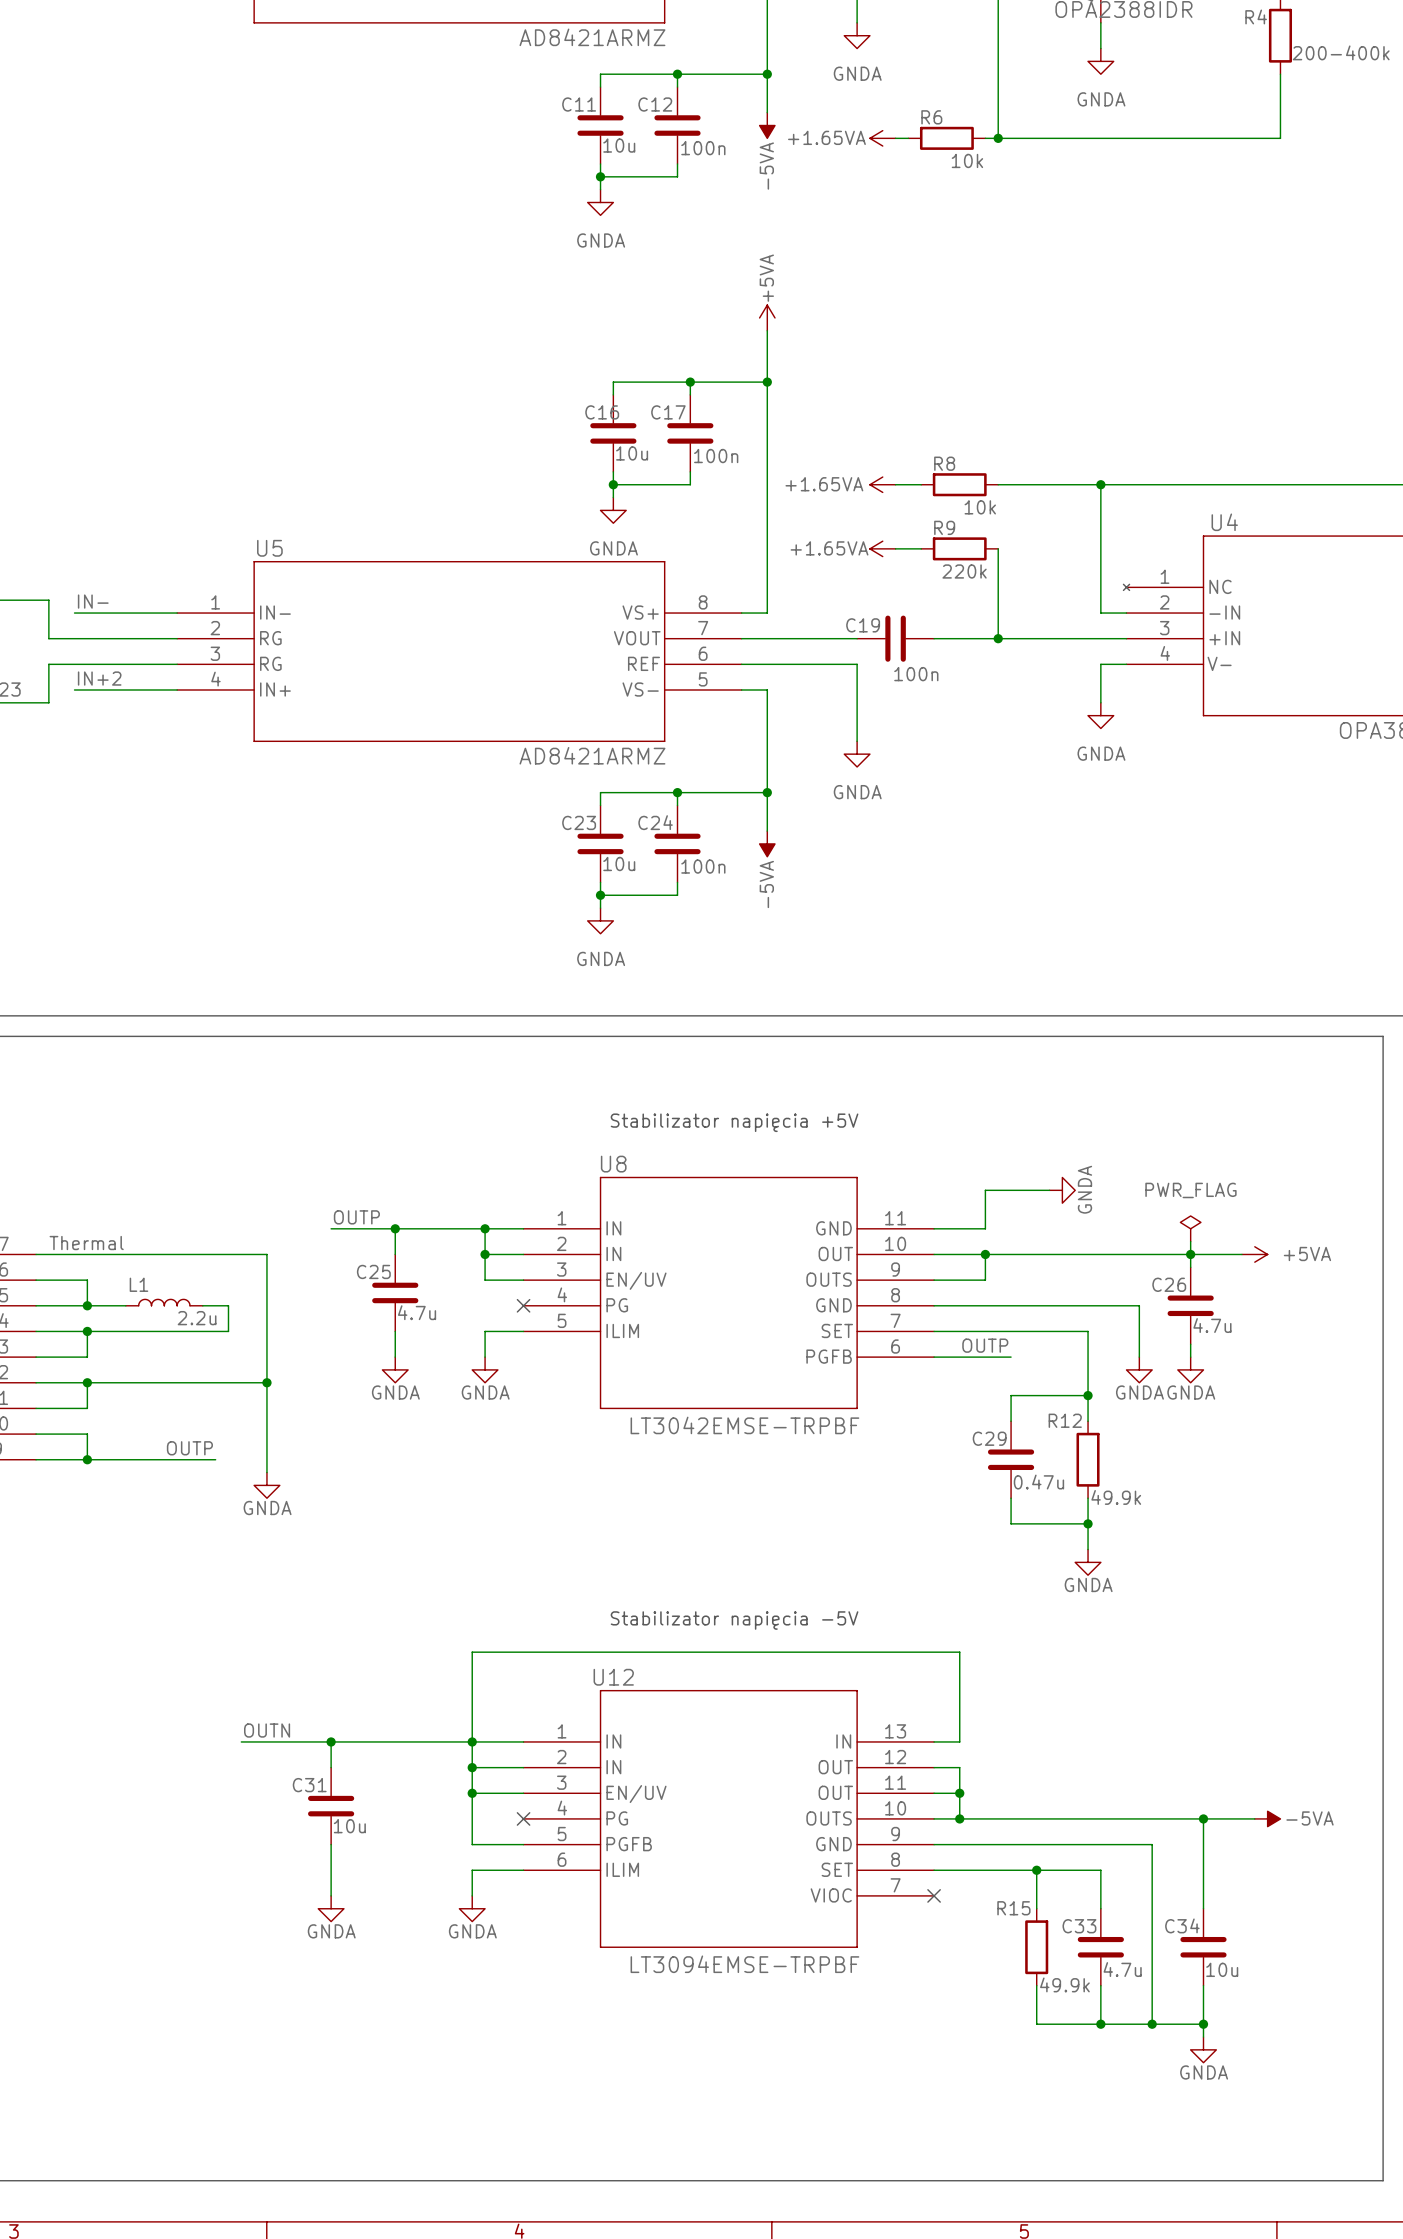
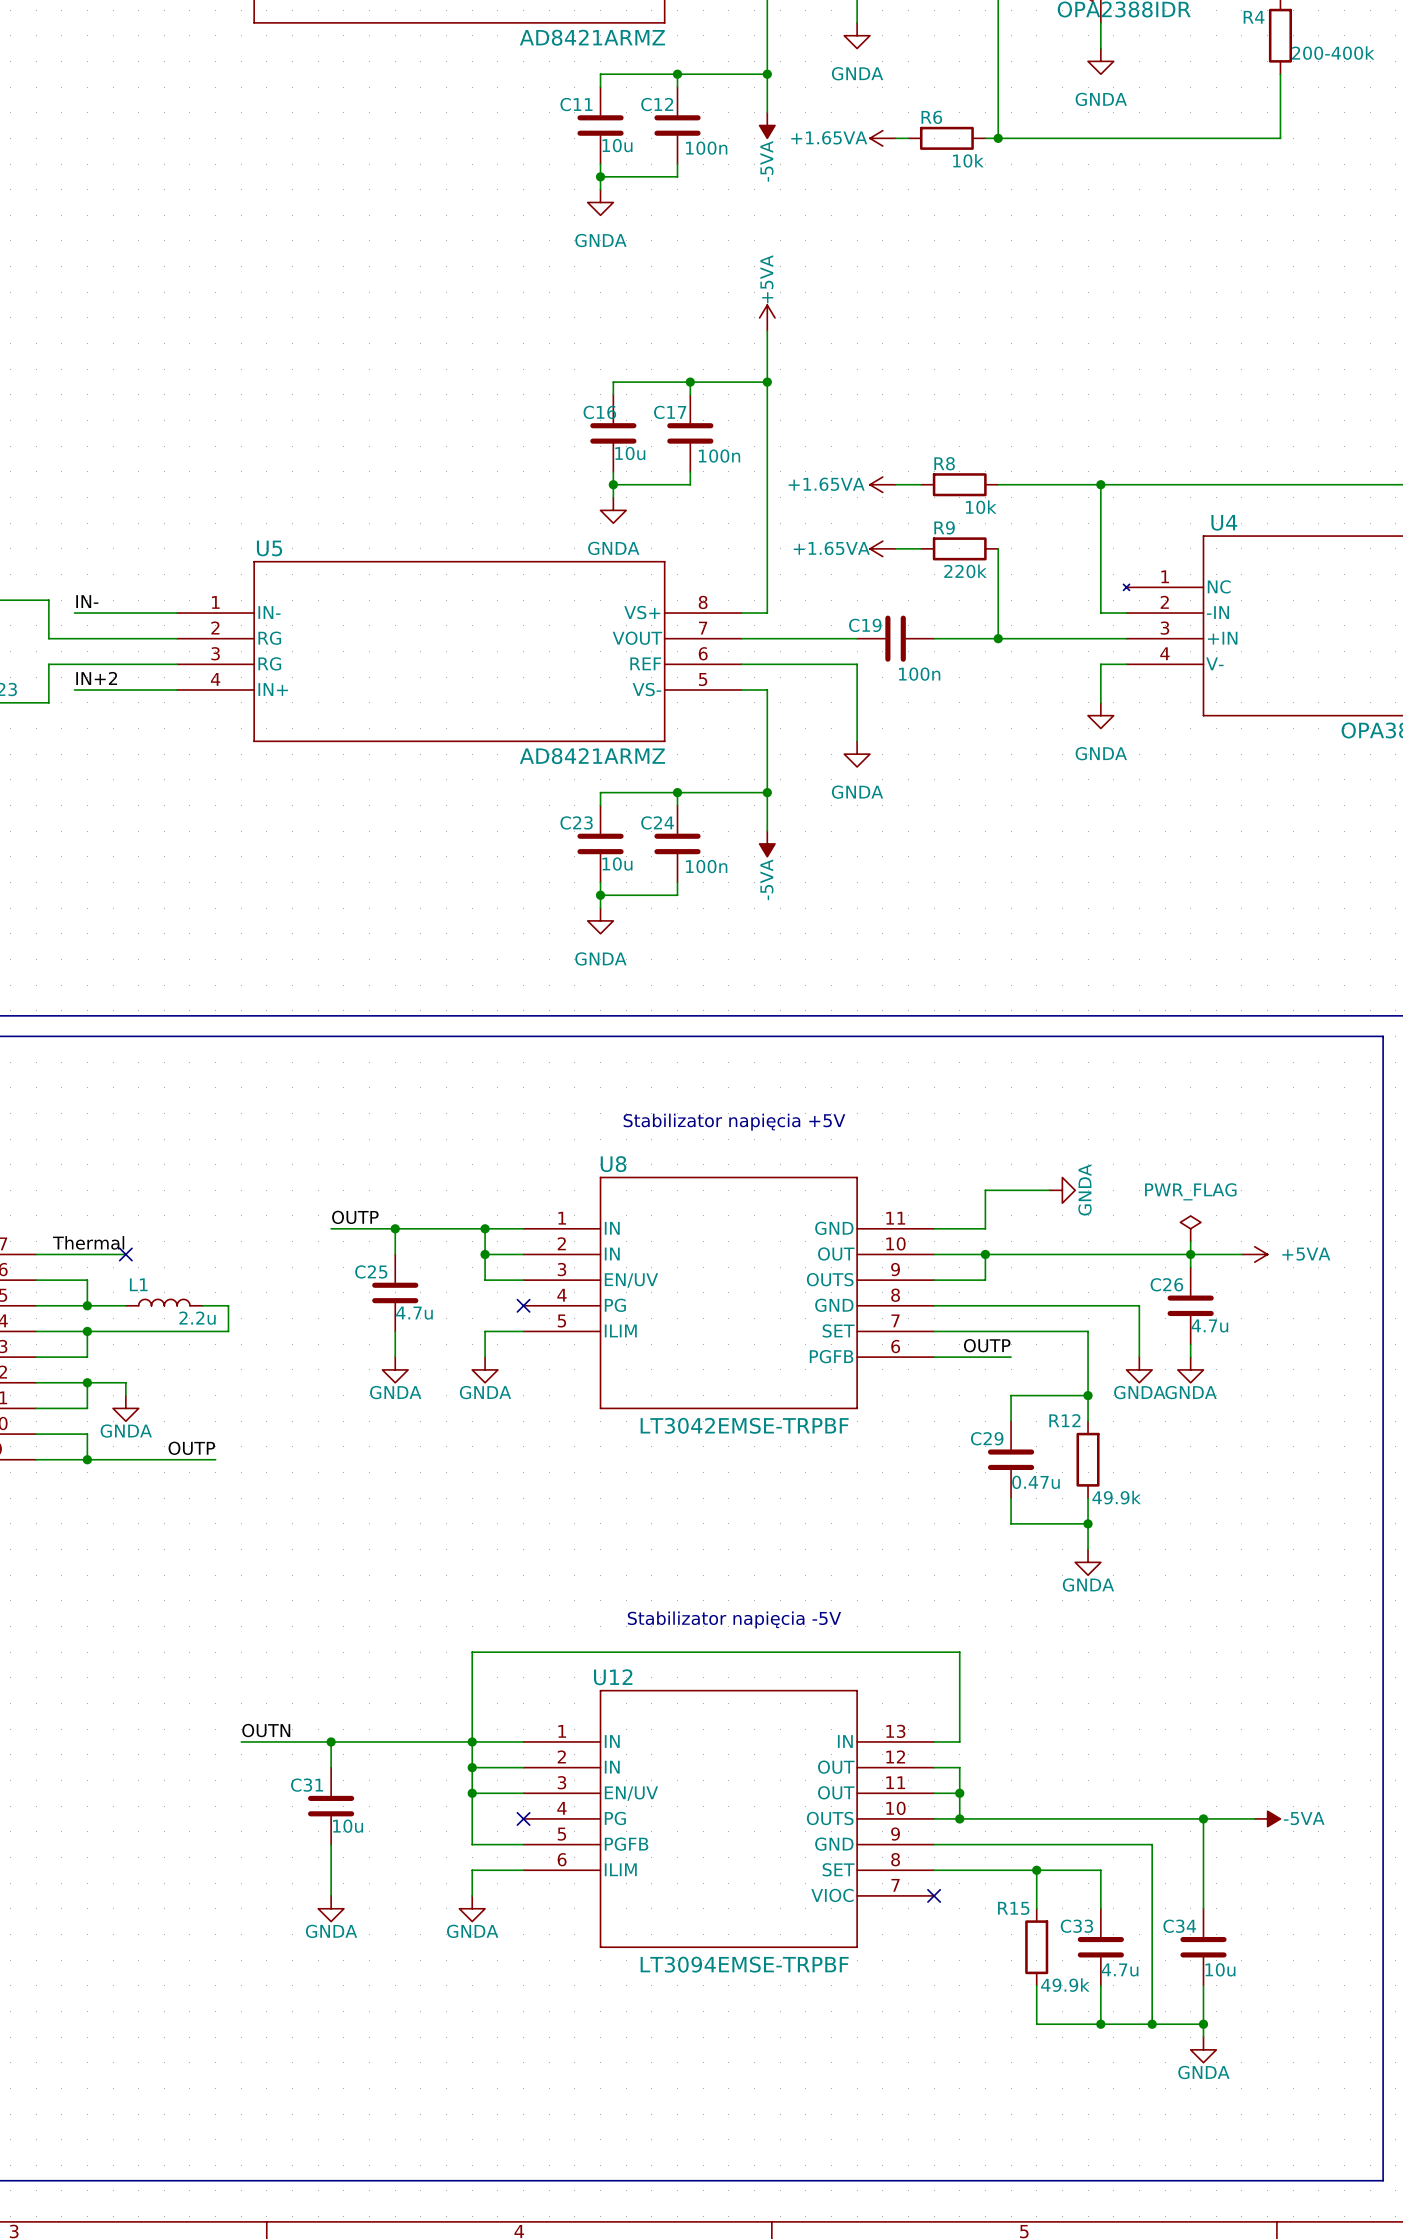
wire: (125, 1254) (266, 1254) (266, 1472) -> none
no-connect mark: none -> (125, 1254)
wire: (125, 1382) (266, 1382) -> (125, 1382) (125, 1395)
junction: (266, 1382) -> none
power symbol position: GNDA (266, 1485) -> GNDA (125, 1408)

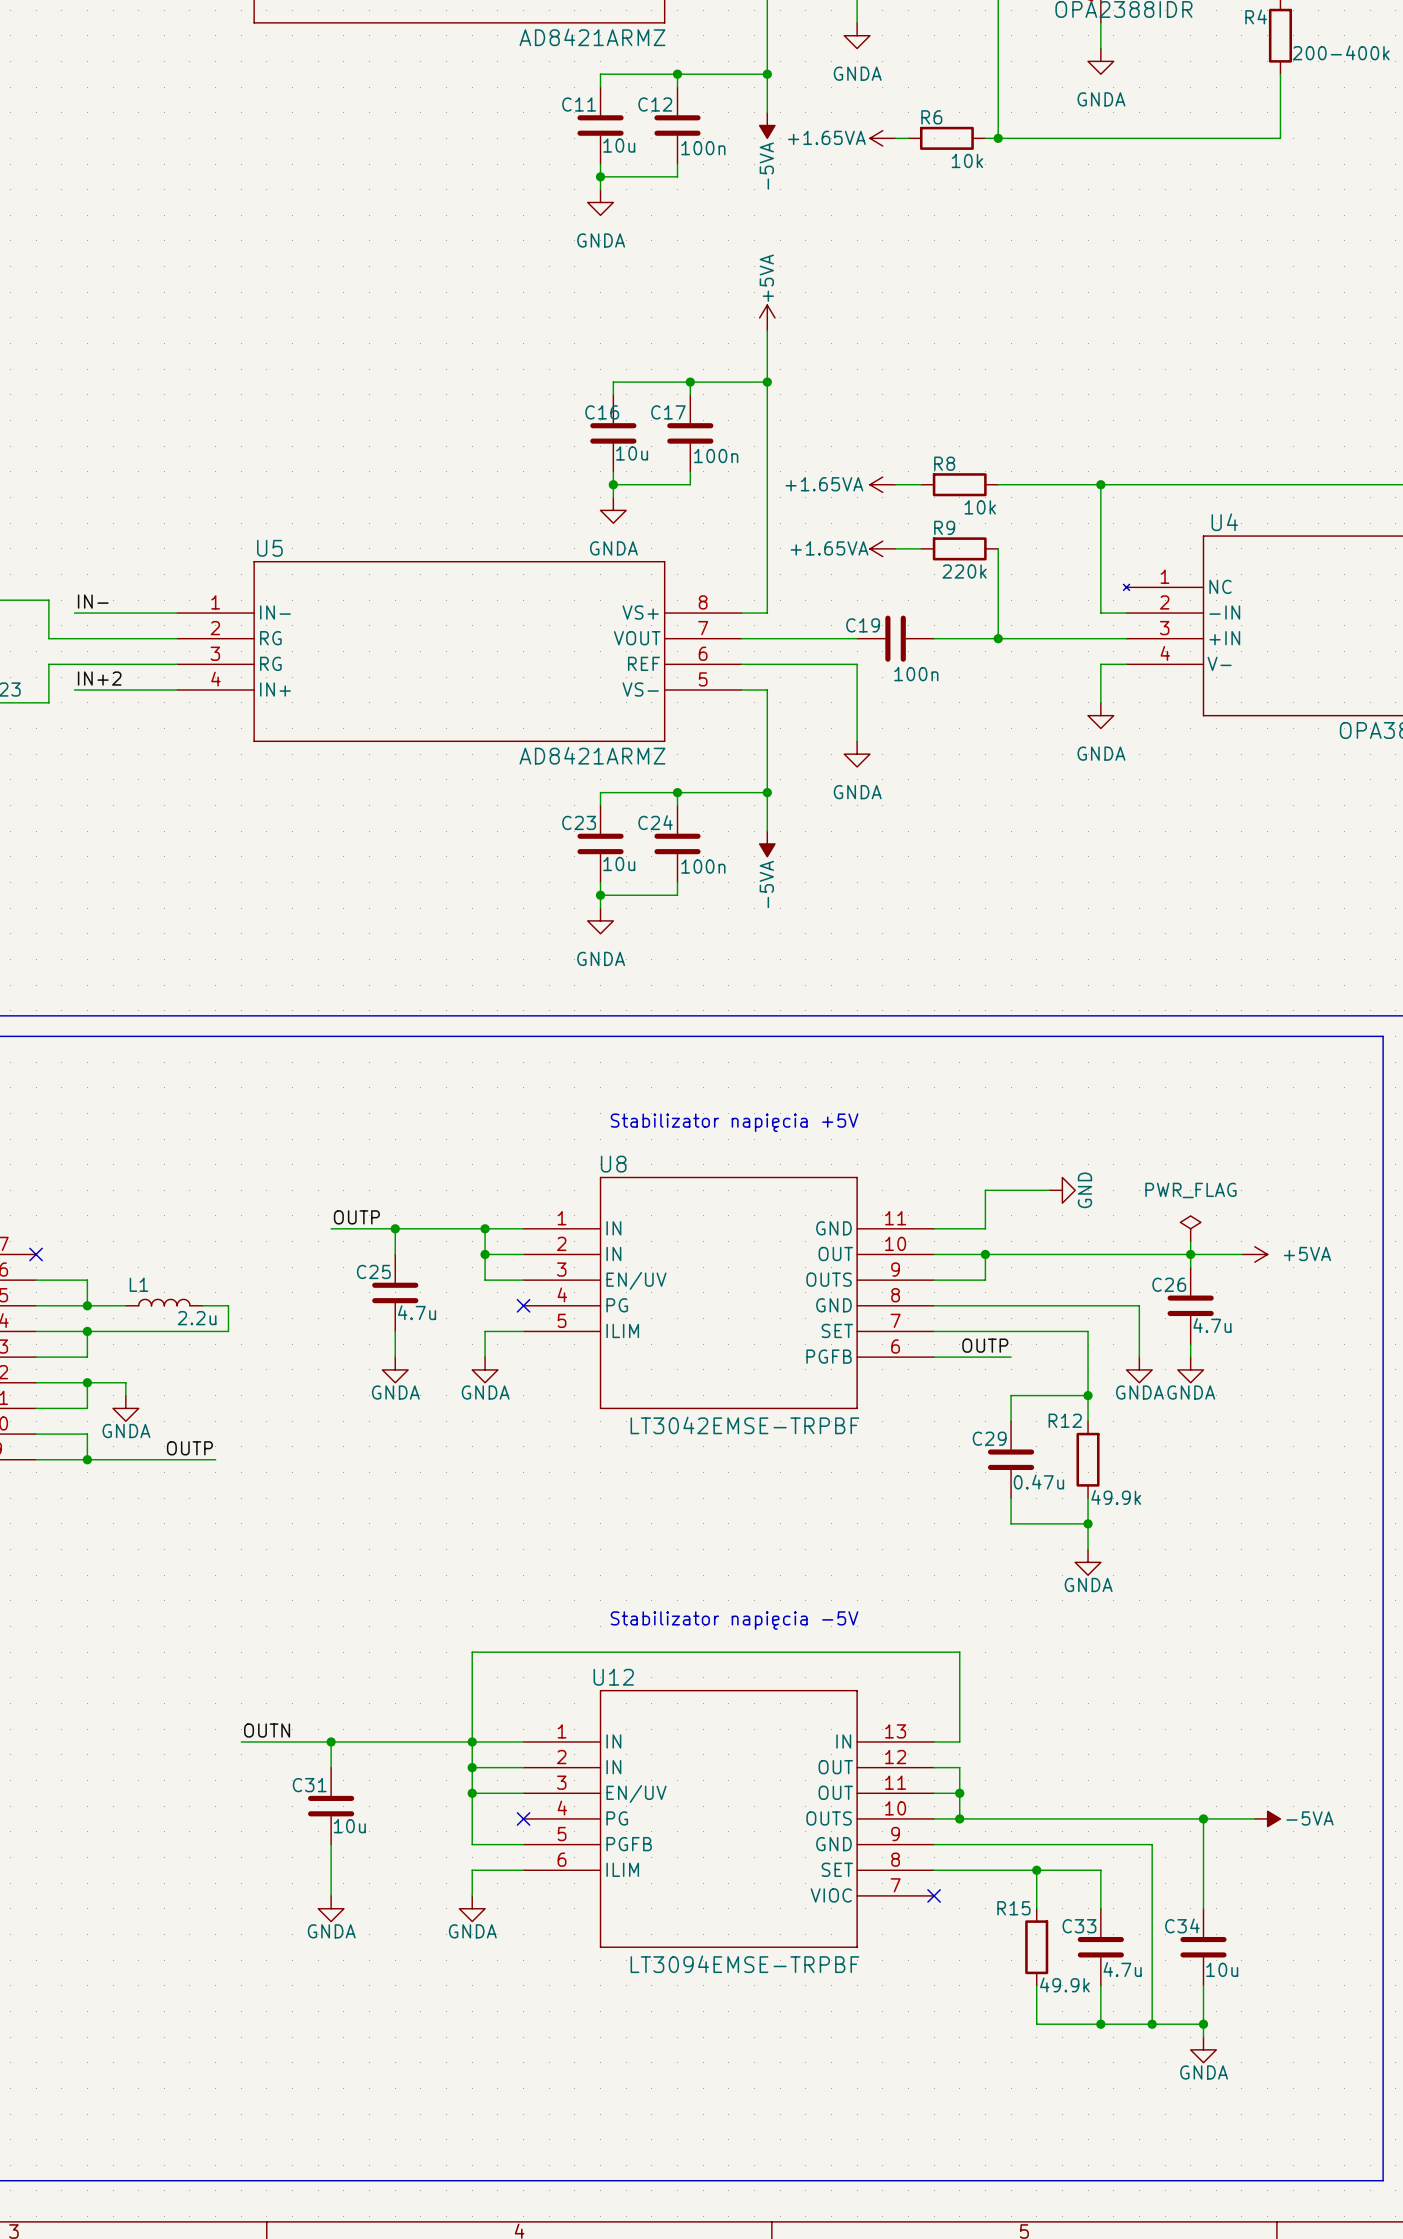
power symbol: GNDA (1062, 1190) -> GND (1062, 1190)
label: Thermal (88, 1242) -> none
wire: (36, 1254) (125, 1254) -> none
no-connect mark: none -> (36, 1254)
no-connect mark: (125, 1254) -> none

